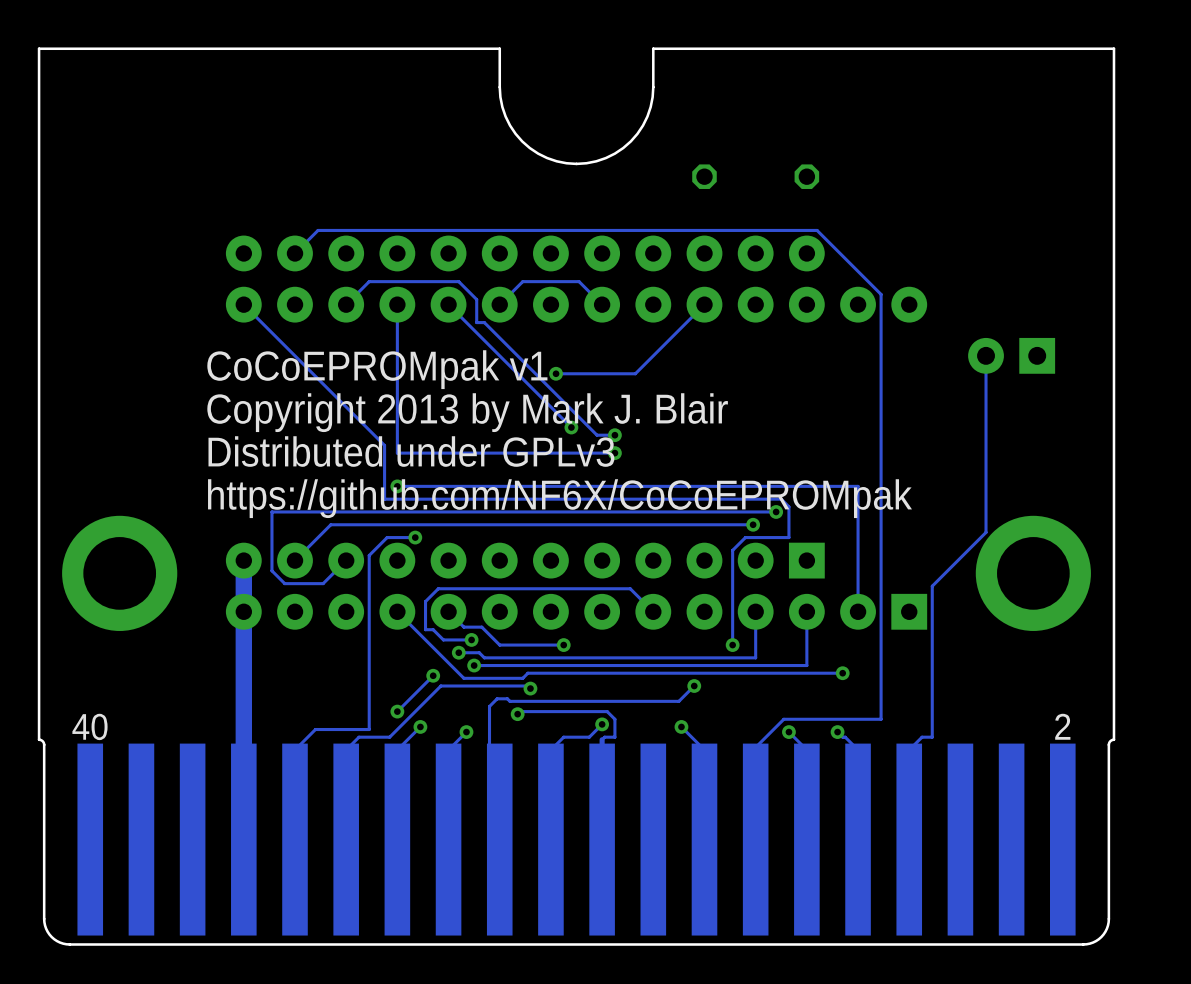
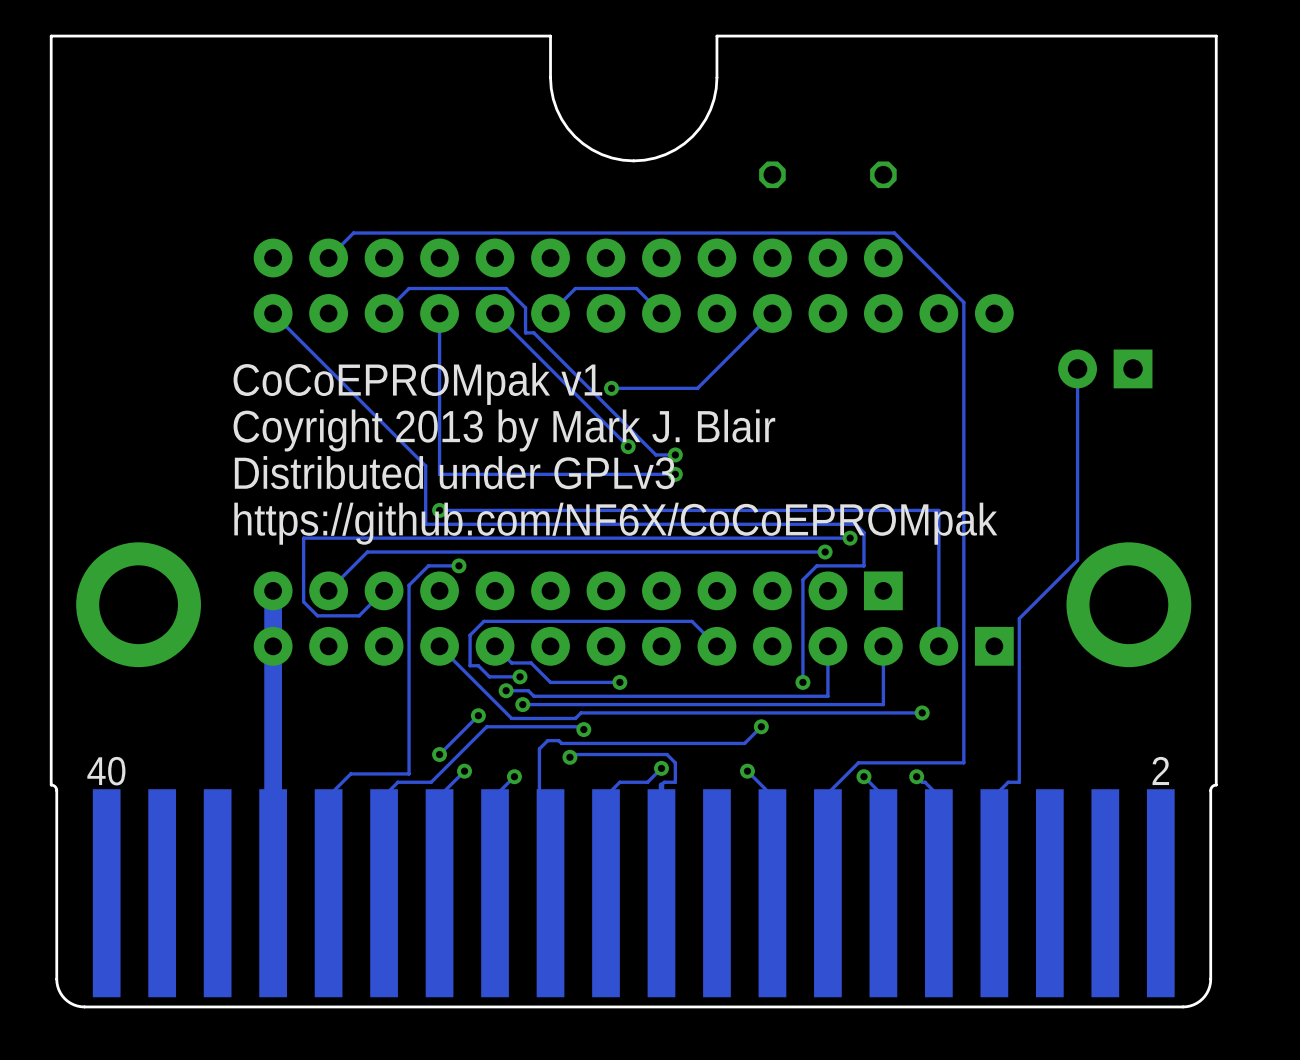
text: Copyright 2013 by Mark J. Blair (467, 412) -> Coyright 2013 by Mark J. Blair (504, 430)

